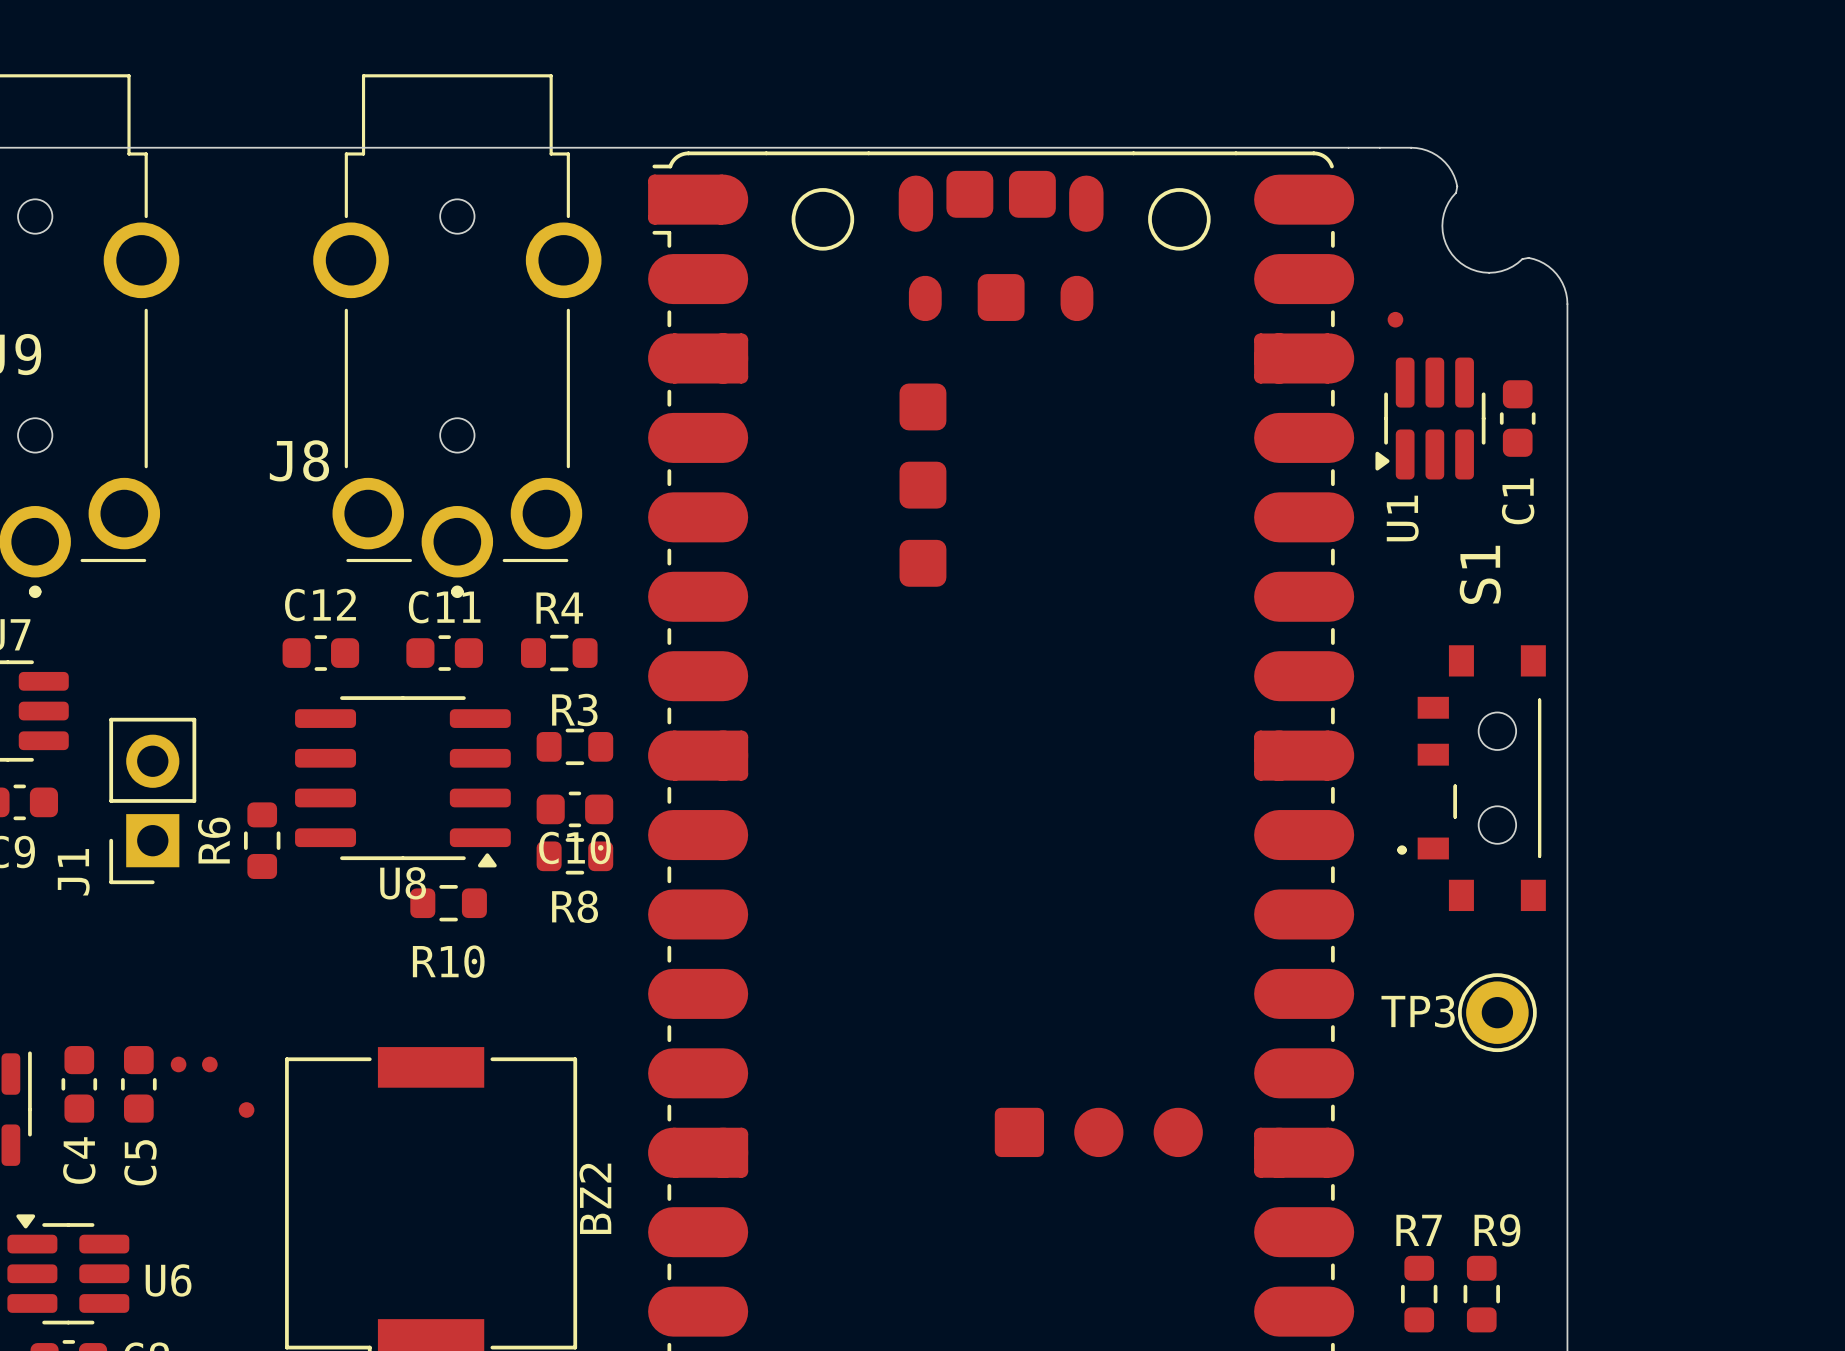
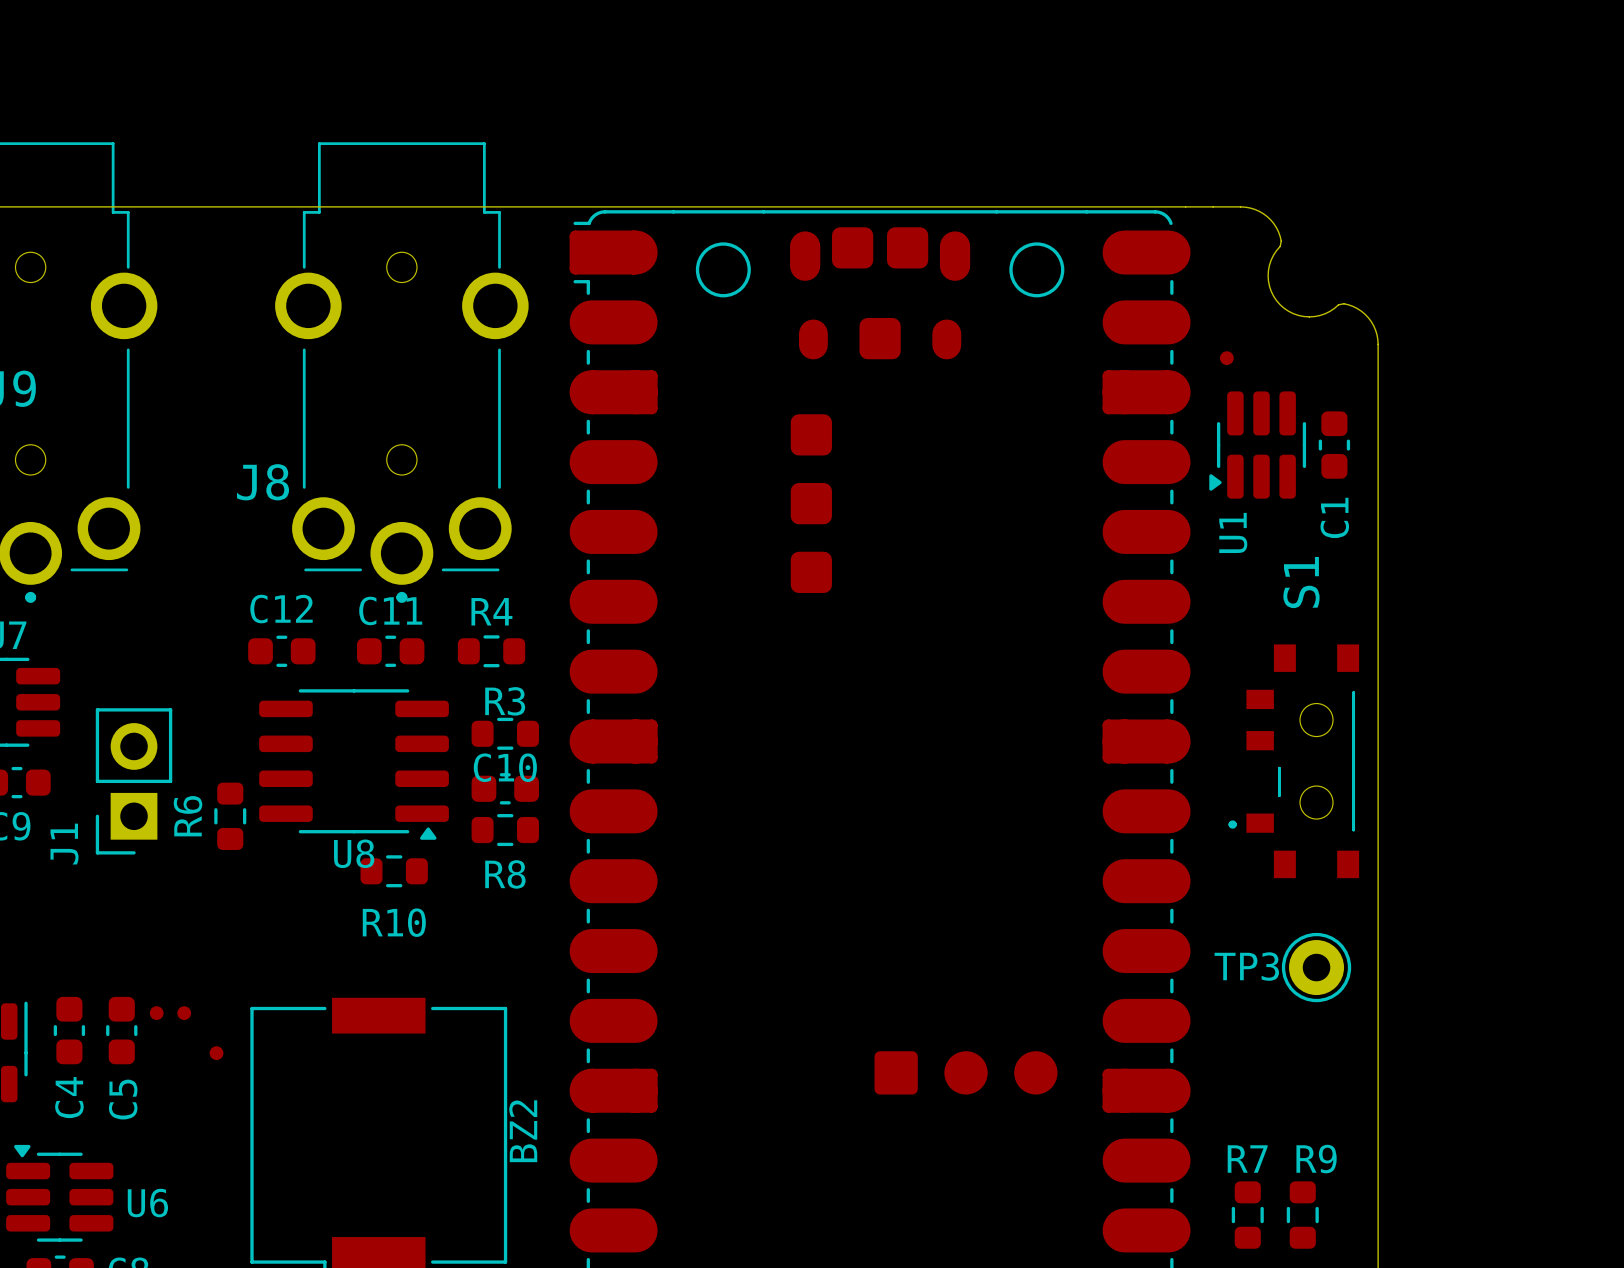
C10 name position: C10 (574, 847) -> C10 (505, 767)

